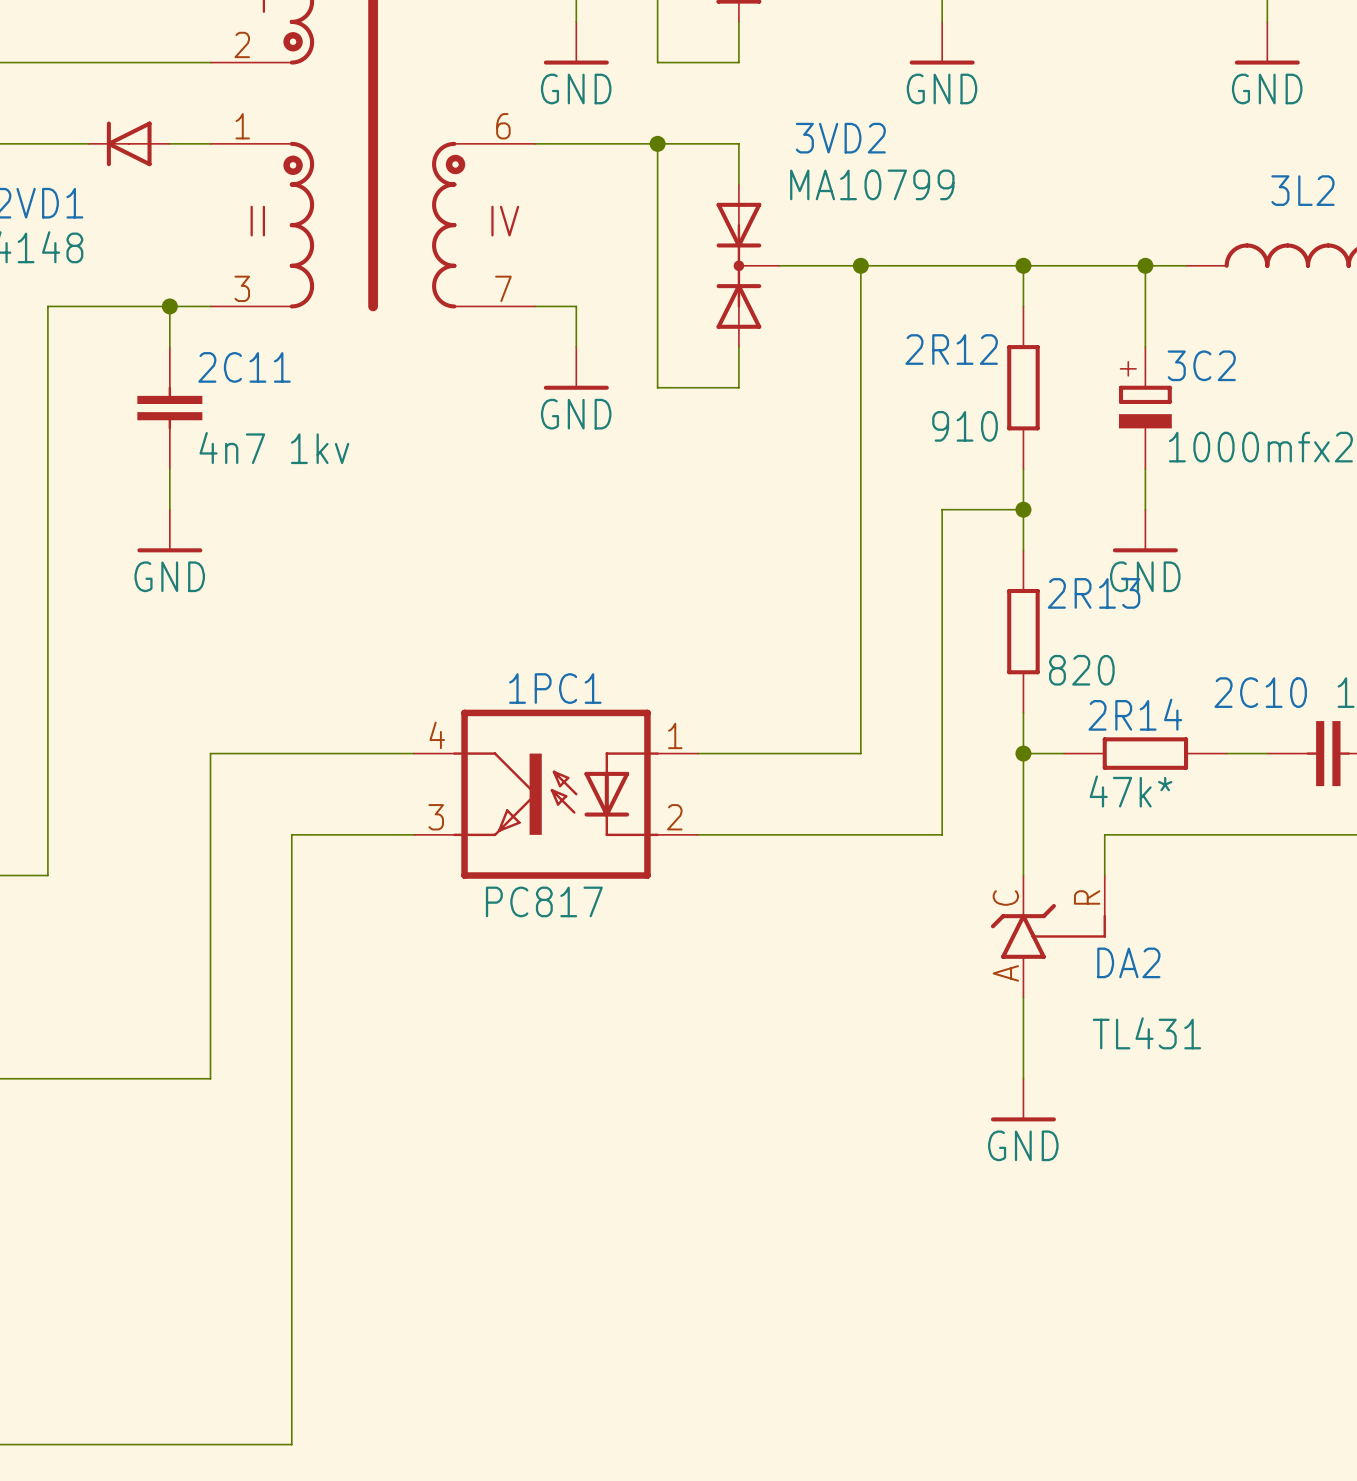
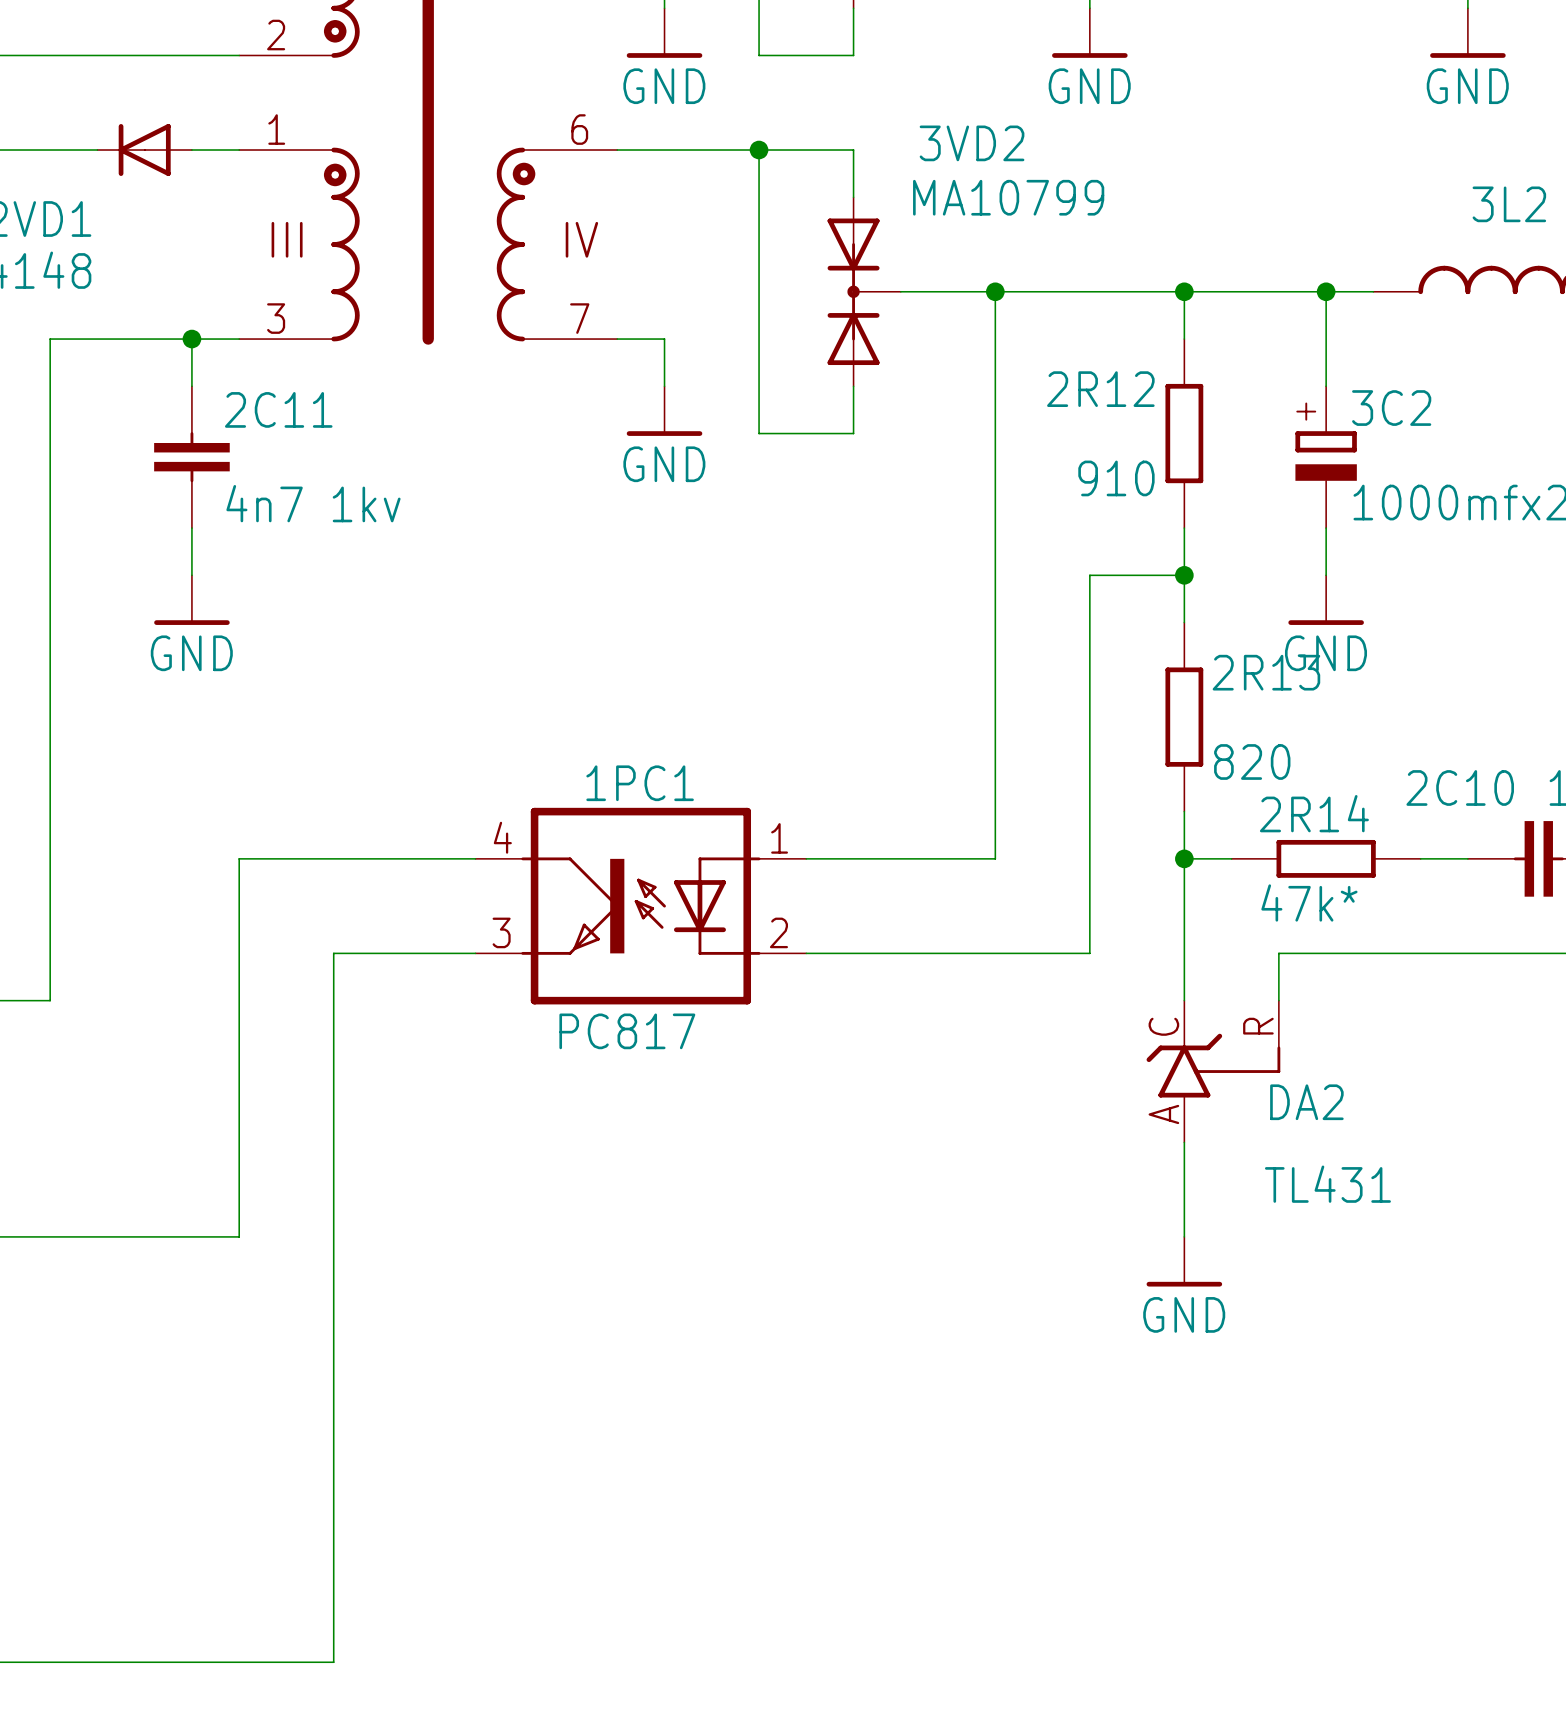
part text: II (257, 221) -> III (287, 239)

